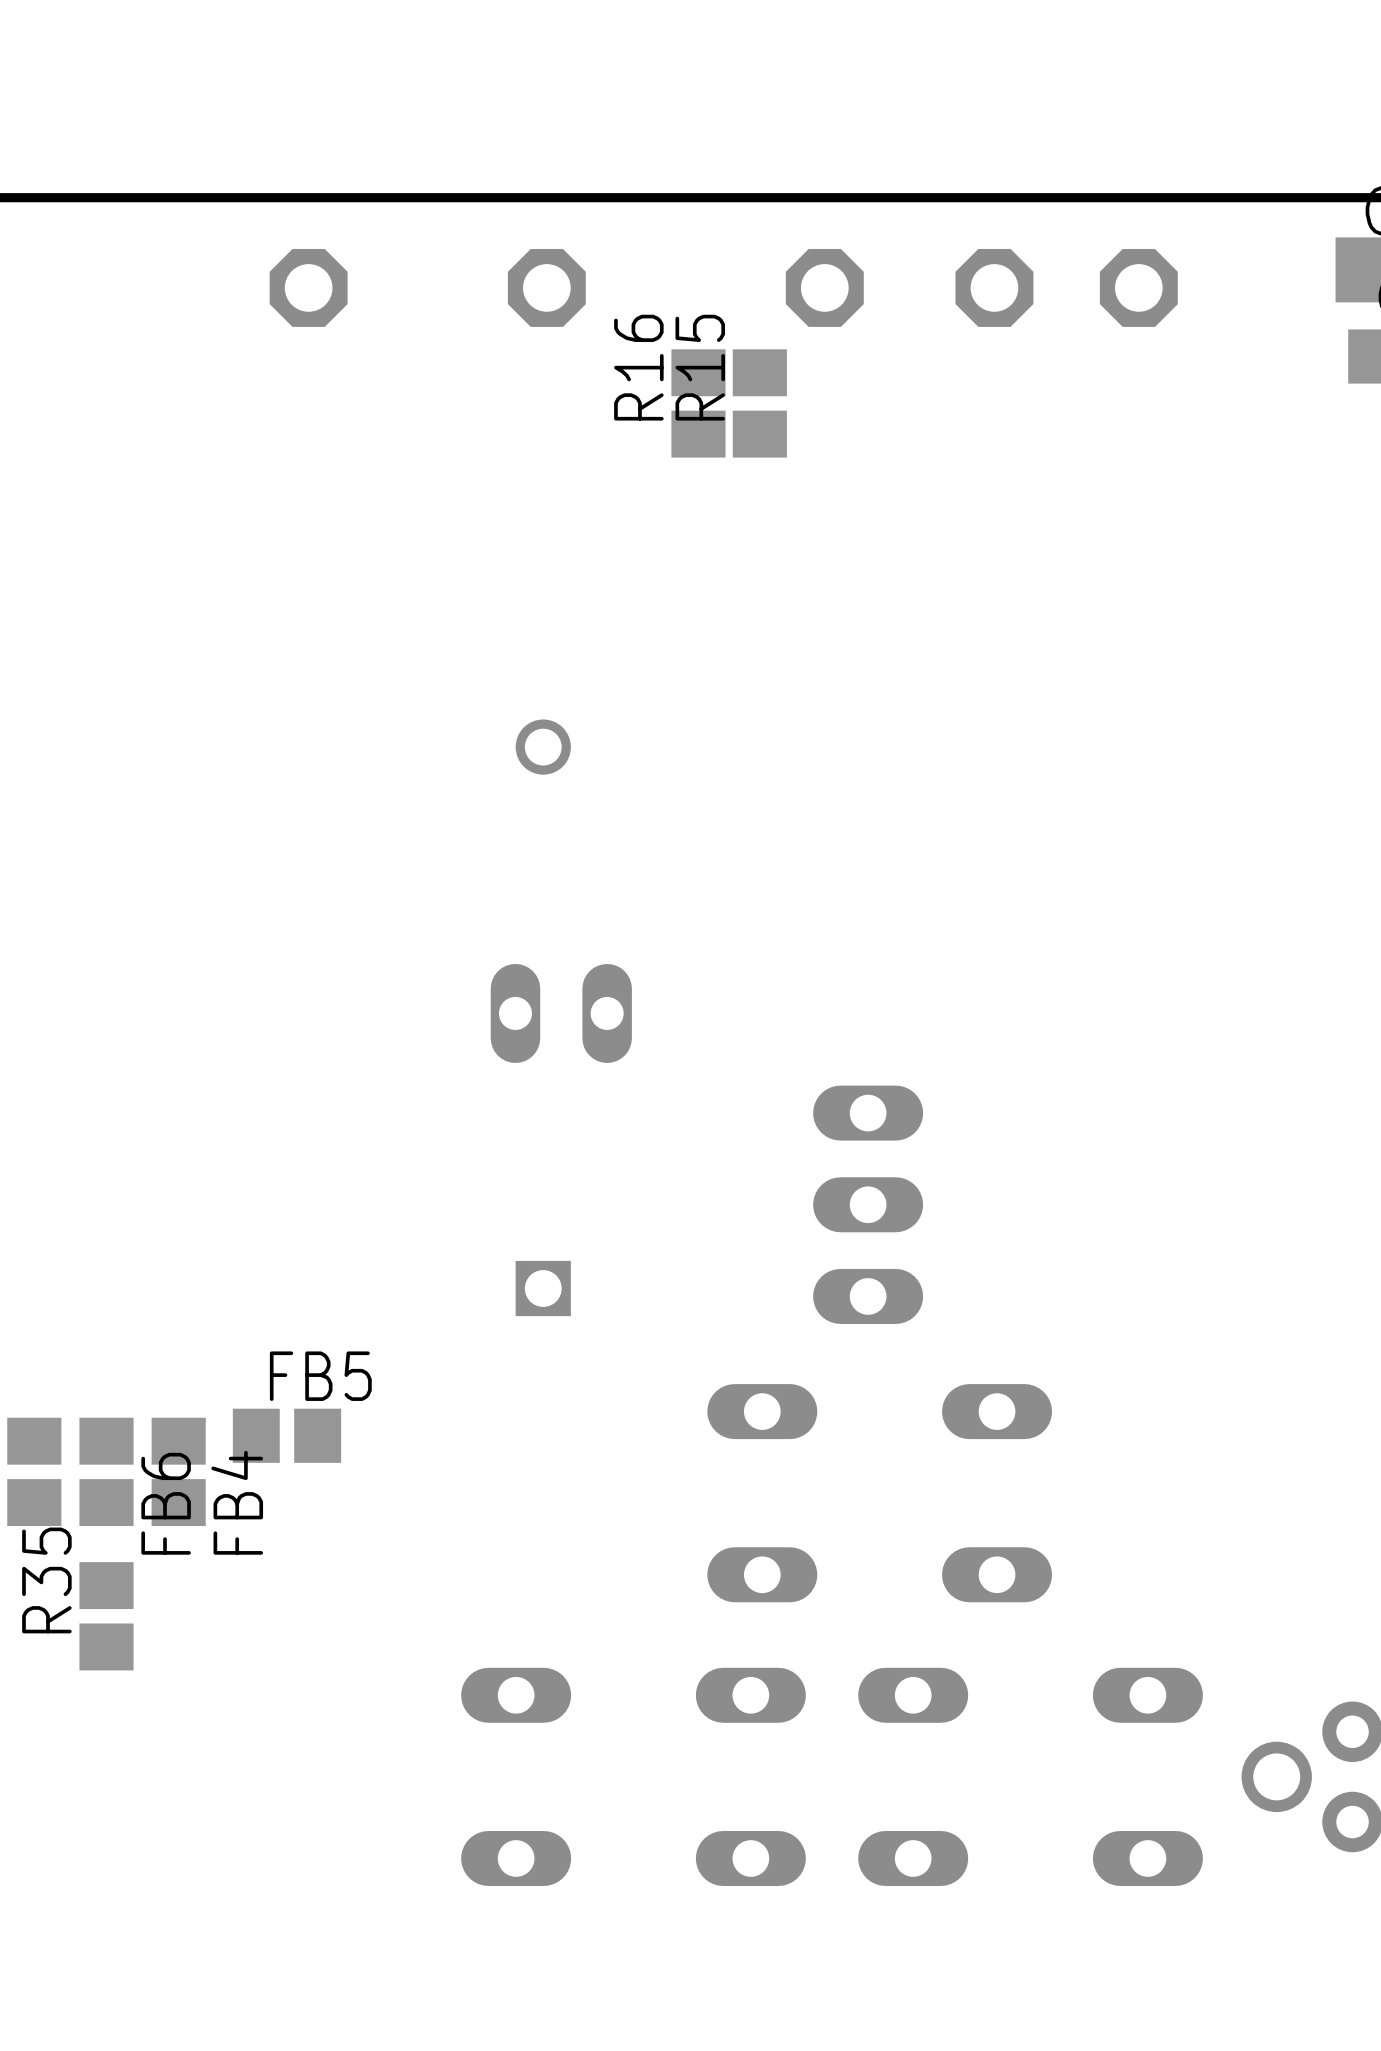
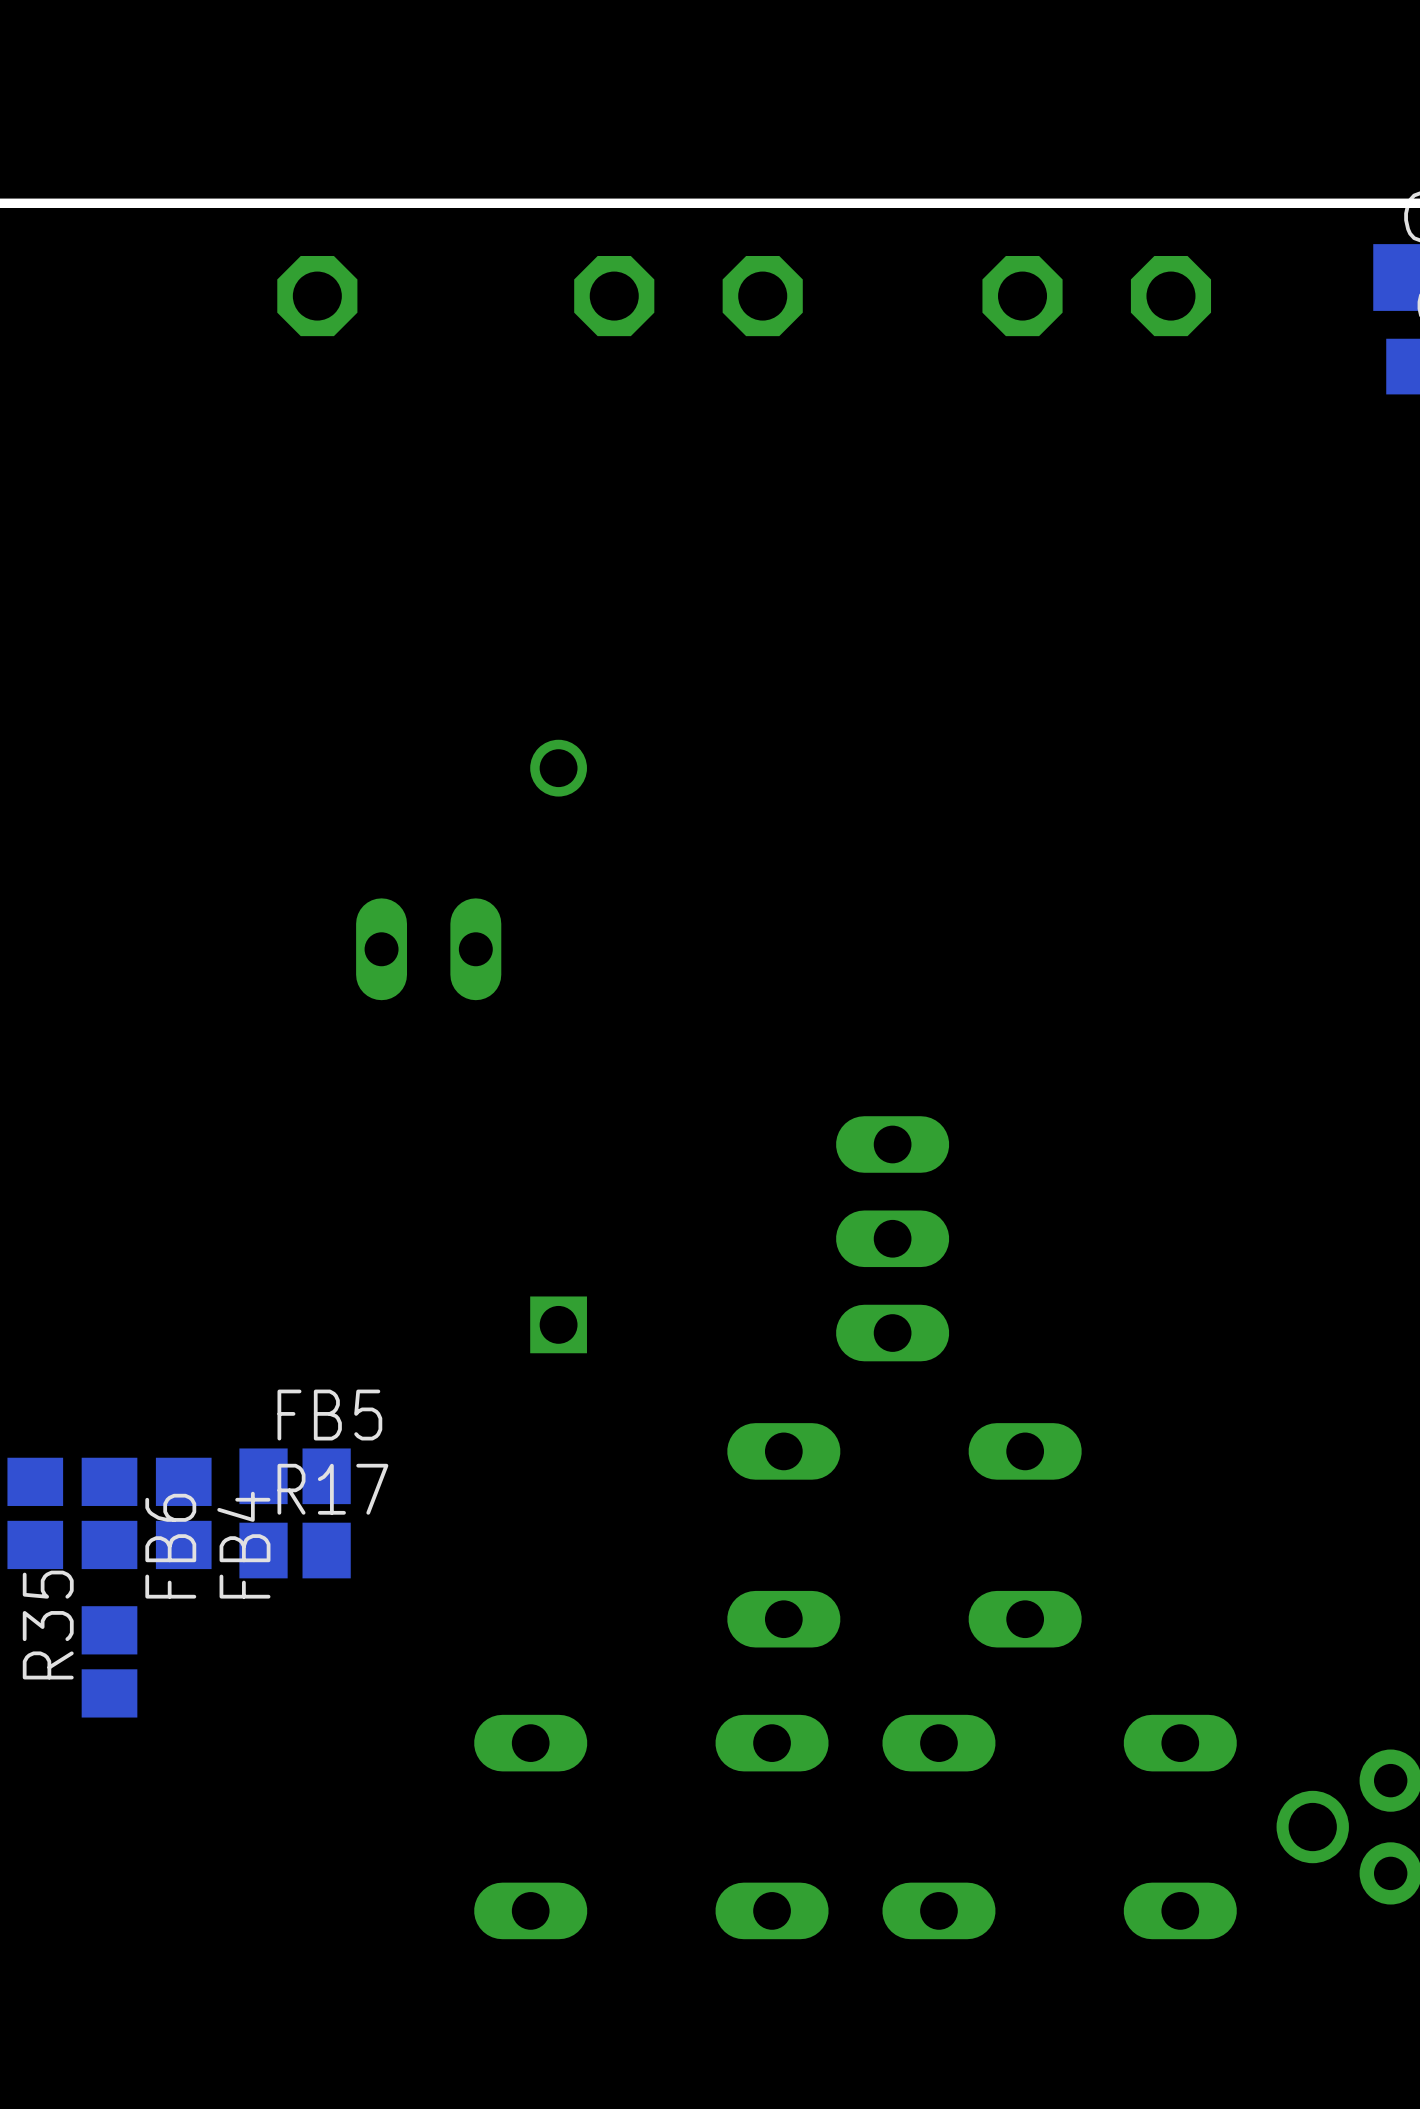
part position: (546, 287) -> (614, 296)
part position: (824, 287) -> (762, 296)
R16: (698, 403) -> none
R15: (759, 403) -> none
part position: (561, 1013) -> (428, 949)
R17: none -> (295, 1550)

